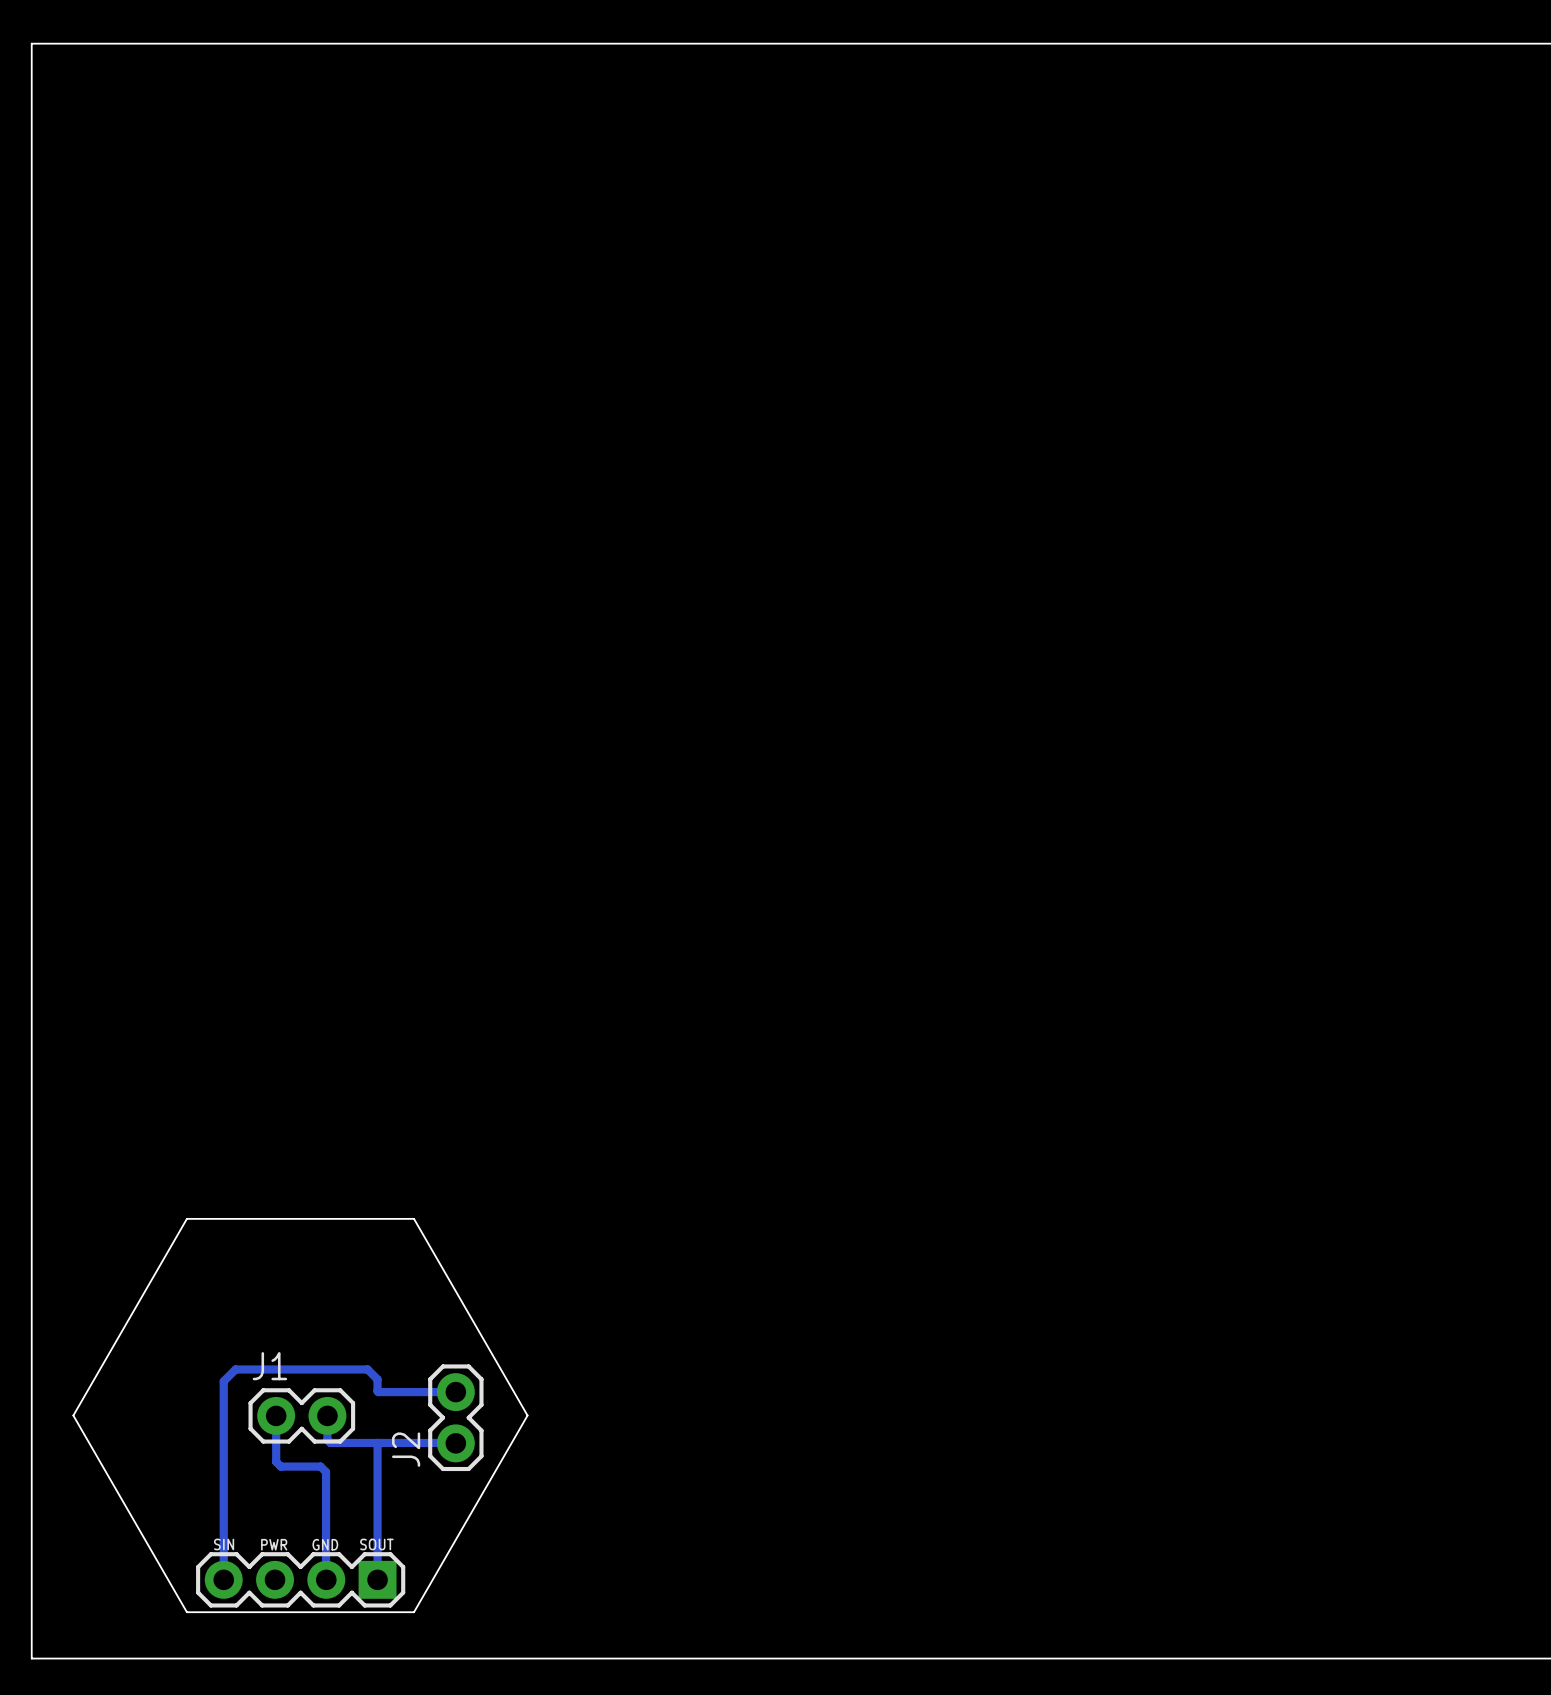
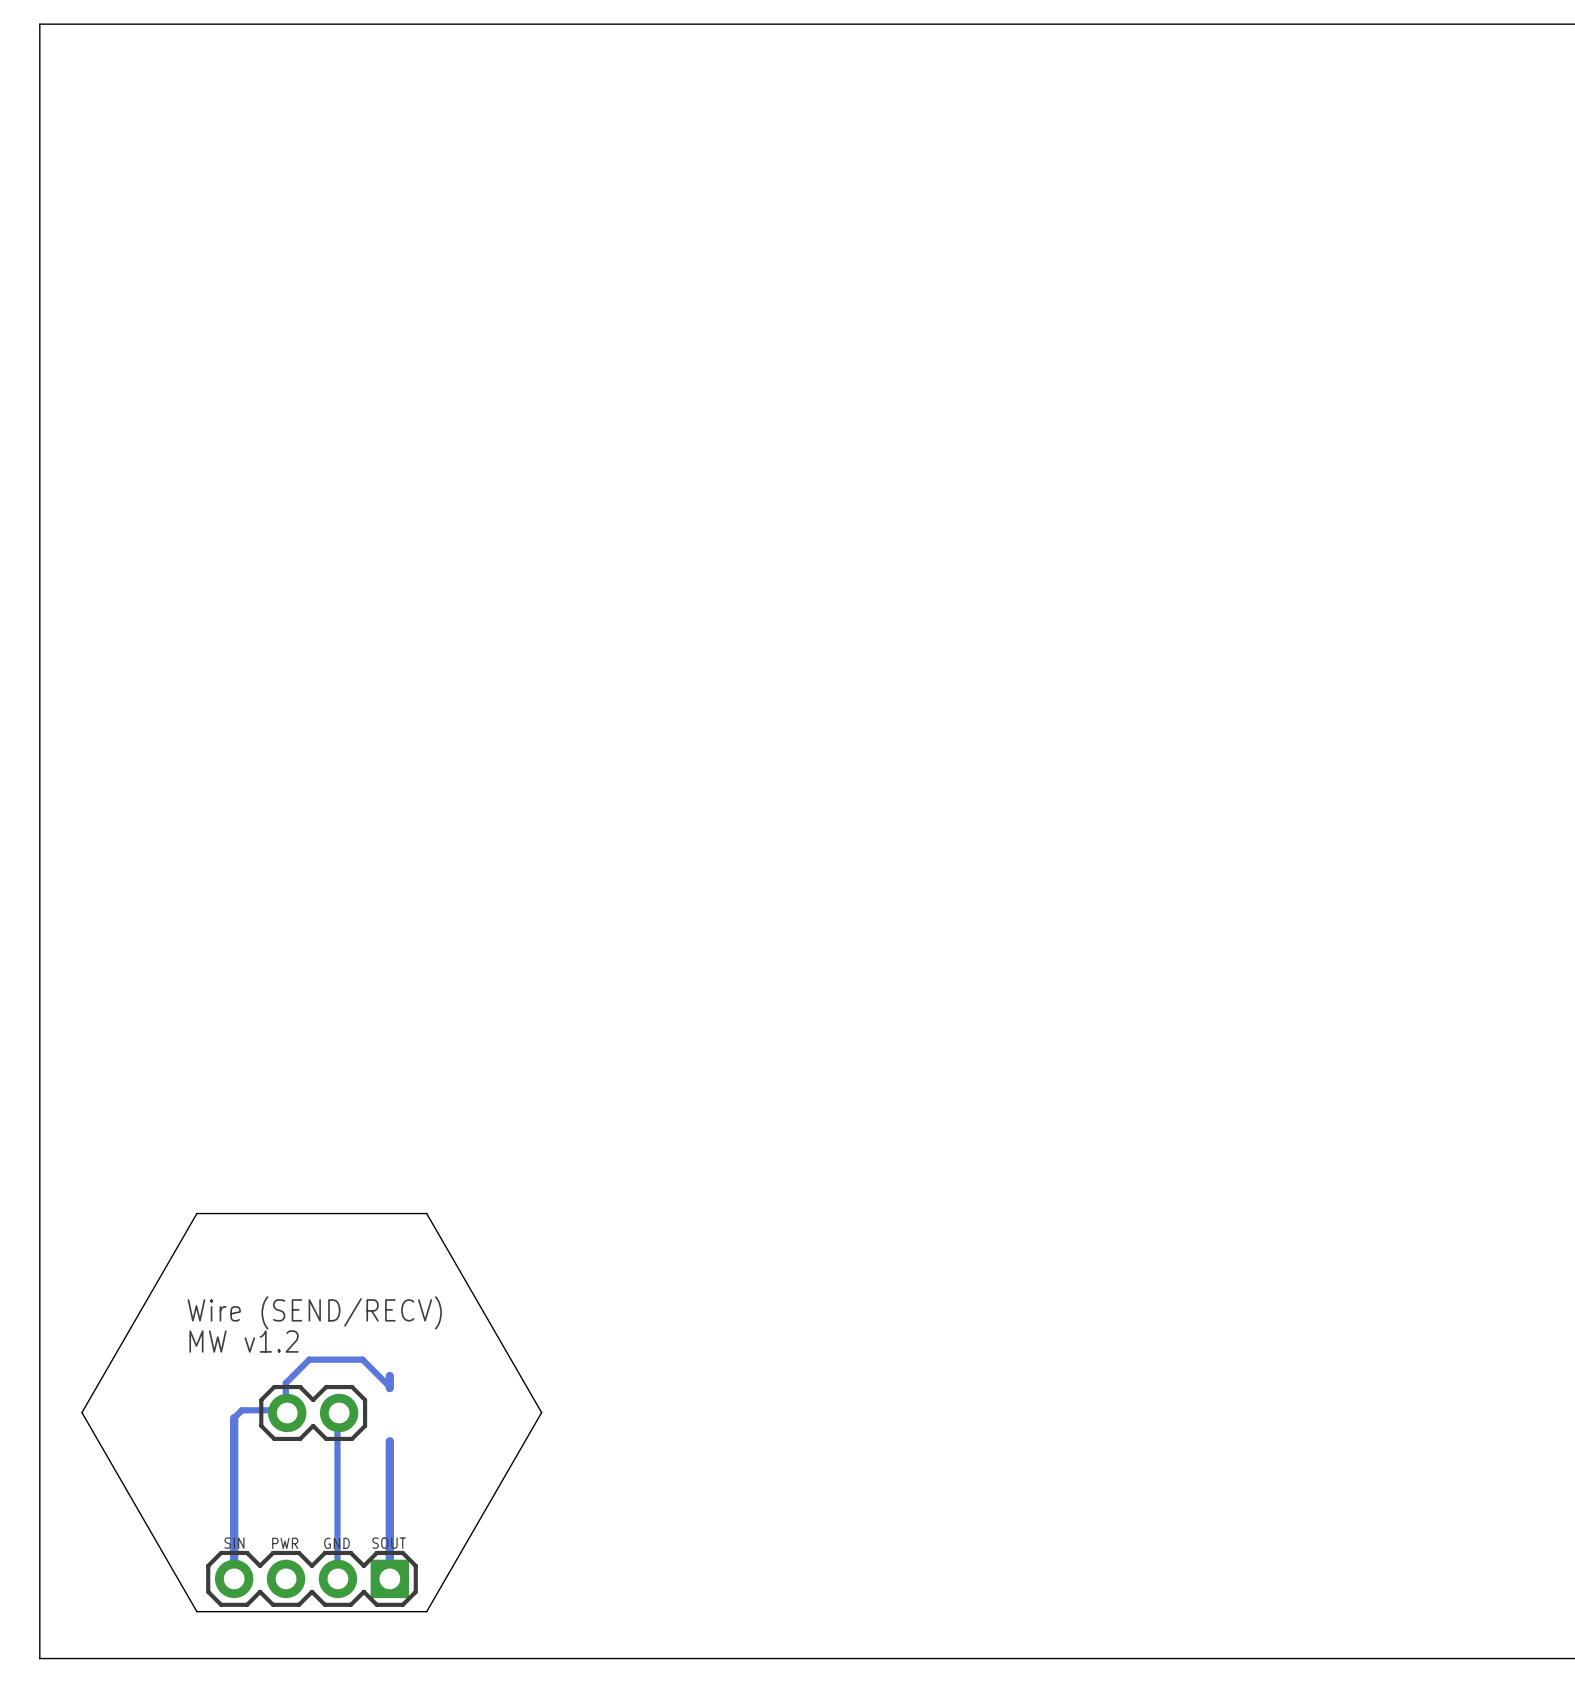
text: none -> Wire (SEND/RECV) (314, 1312)
text: none -> MW v1.2 (244, 1341)
J1 name: J1 (269, 1366) -> none
bottom track: (377, 1379) (367, 1369) (235, 1369) (223, 1381) (223, 1420) -> (285, 1410) (241, 1410) (234, 1418)
bottom track: none -> (389, 1386) (362, 1359) (309, 1359) (285, 1383) (285, 1410)
bottom track: (377, 1391) (455, 1392) -> none
bottom track: (276, 1415) (276, 1461) (280, 1466) (320, 1466) (326, 1472) (326, 1579) -> (337, 1410) (337, 1578)
bottom track: (327, 1415) (327, 1439) (330, 1442) (455, 1443) -> none
J2: (455, 1417) -> none

